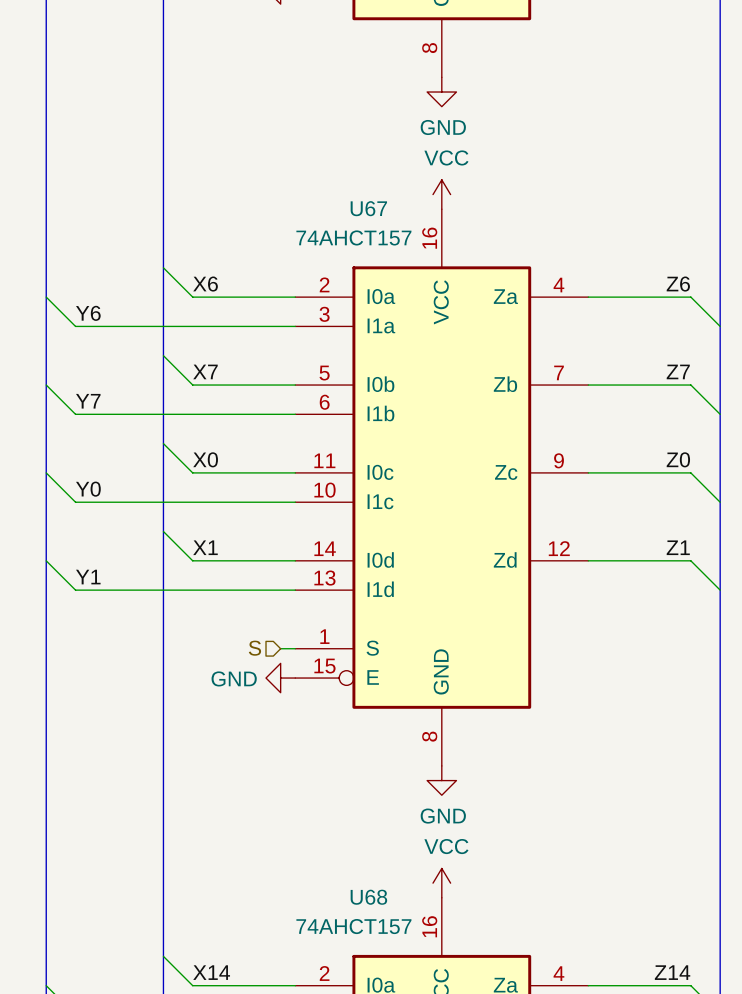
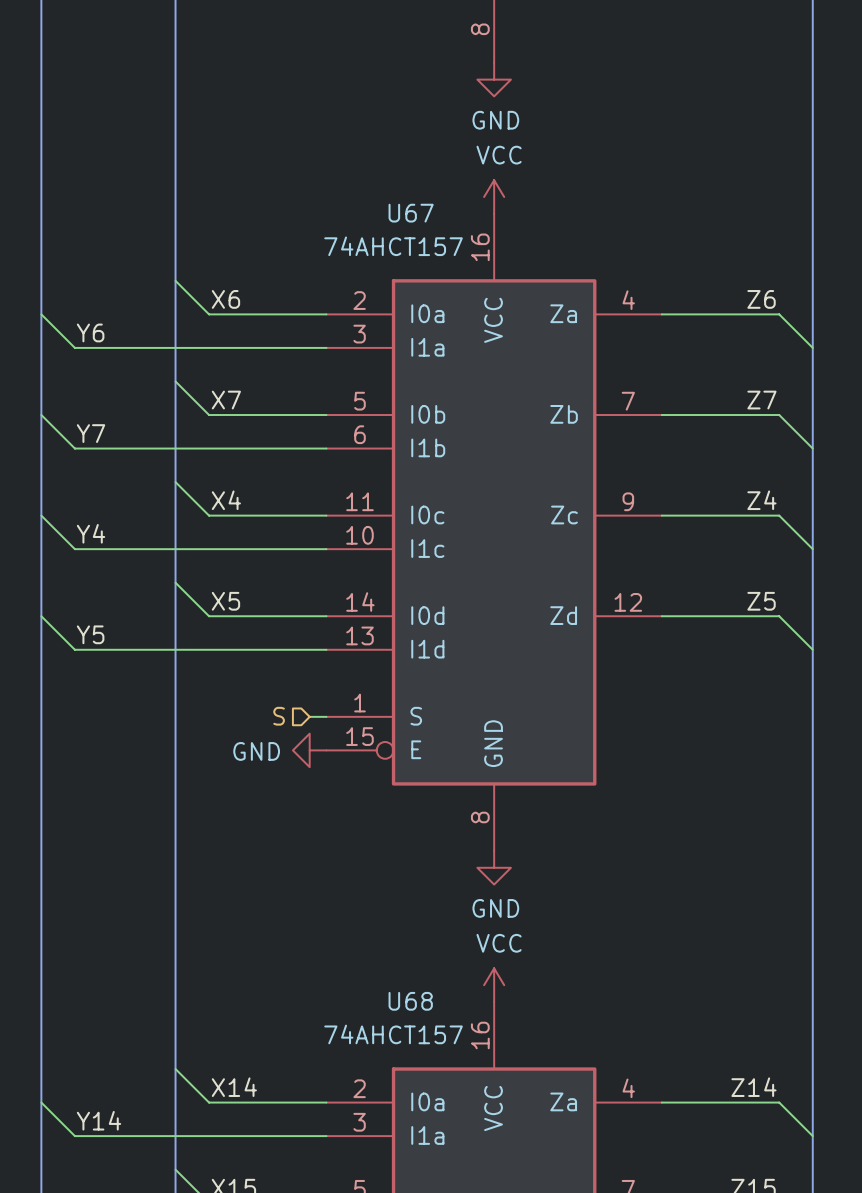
label: X0 (205, 459) -> X4 (226, 500)
label: Z0 (678, 459) -> Z4 (761, 500)
label: Y0 (88, 489) -> Y4 (91, 533)
label: X1 (205, 547) -> X5 (225, 601)
label: Z1 (678, 547) -> Z5 (761, 601)
label: Y1 (88, 577) -> Y5 (90, 634)

